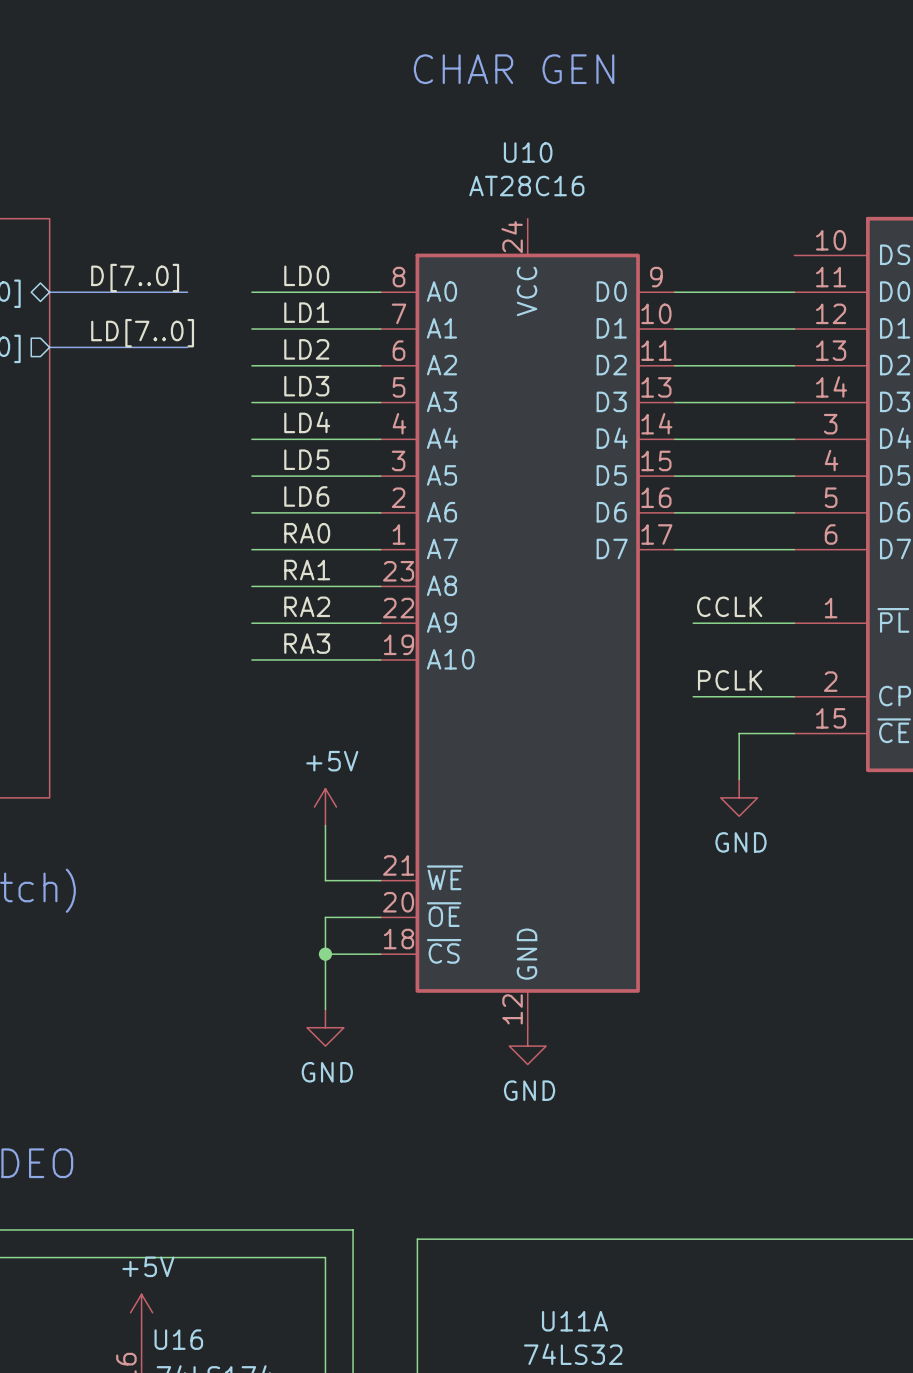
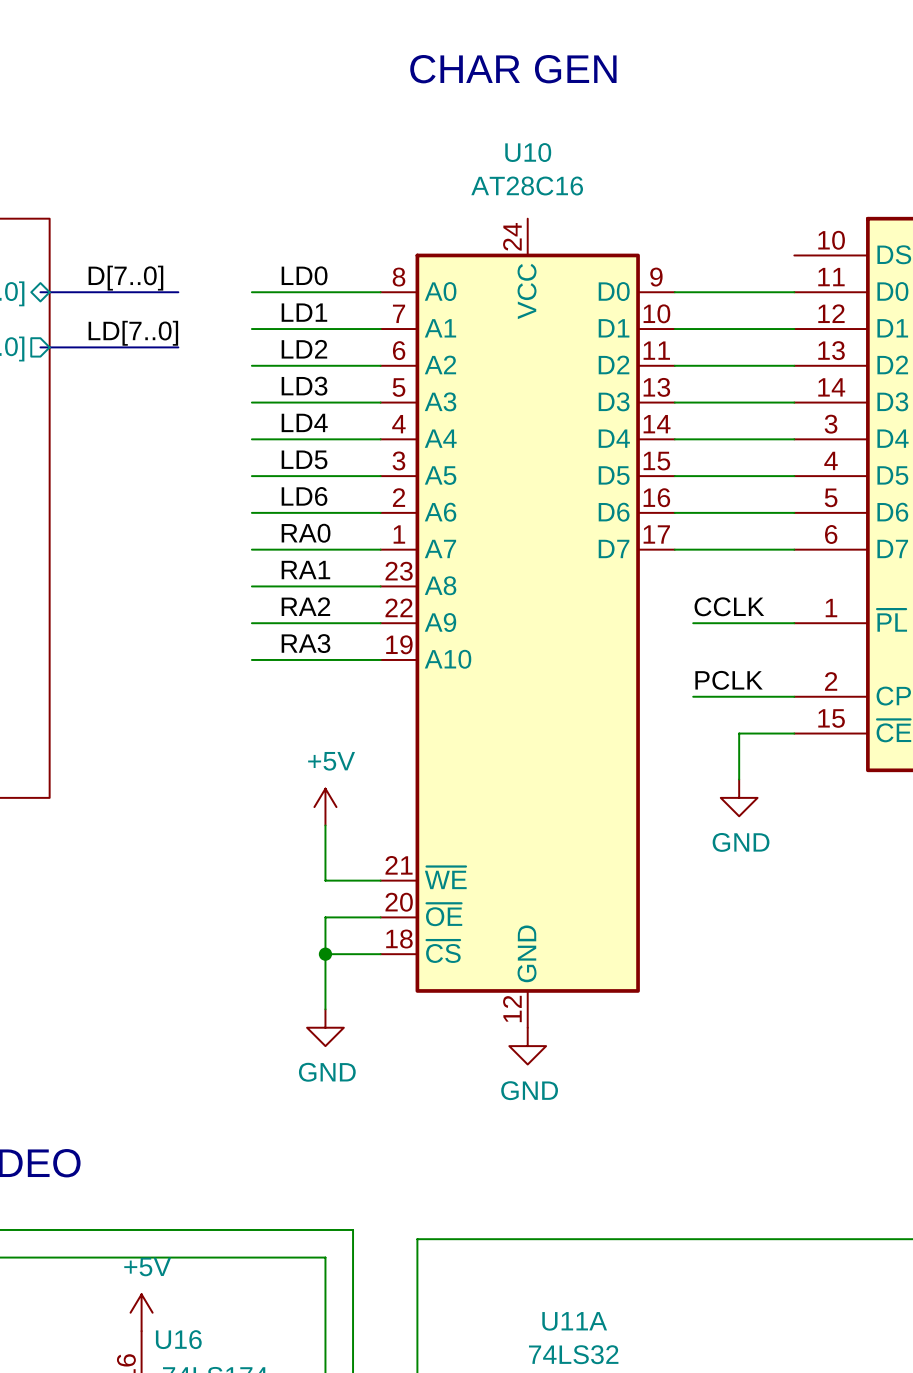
bus: (178, 292) (187, 292) -> (40, 292) (49, 292)
bus: (178, 347) (187, 347) -> (40, 347) (49, 347)

